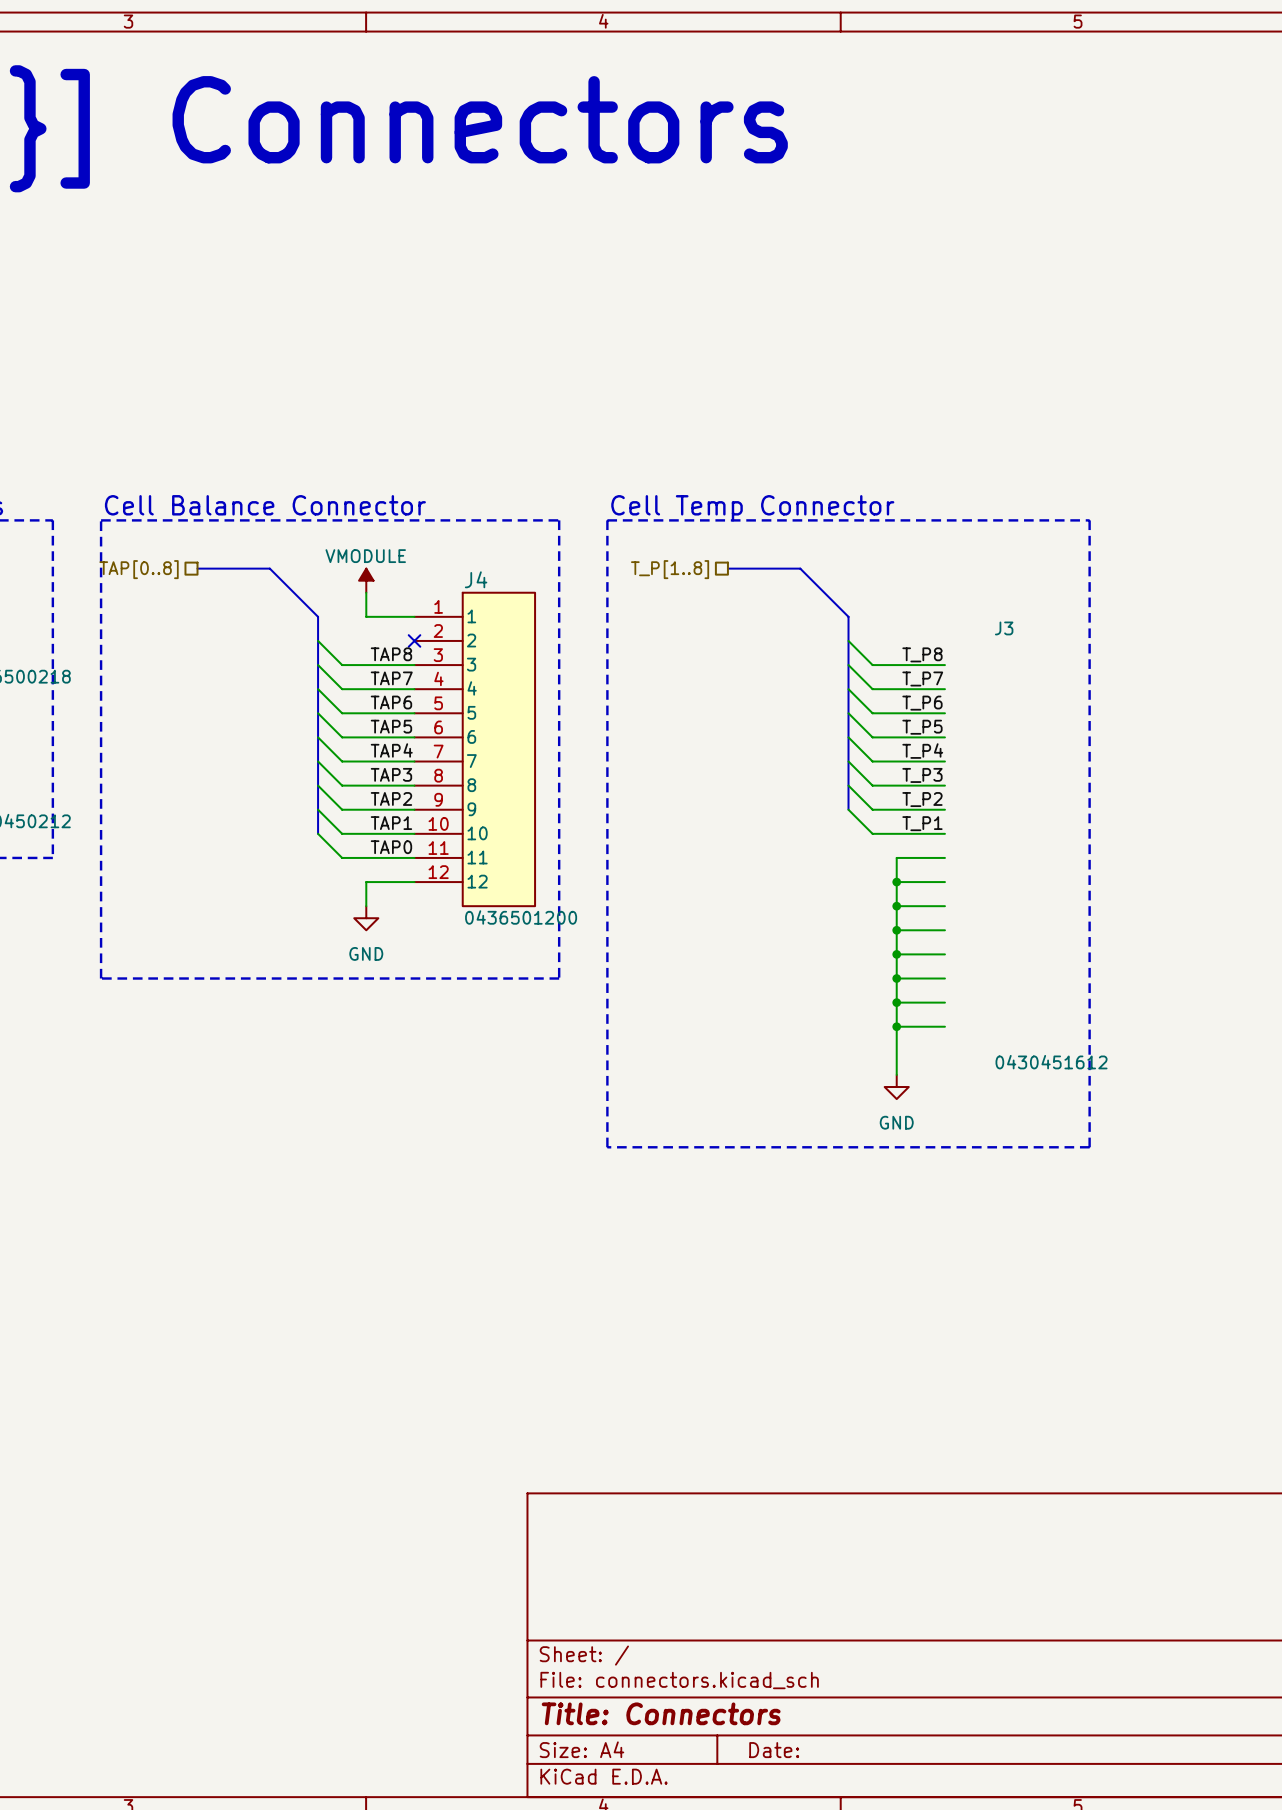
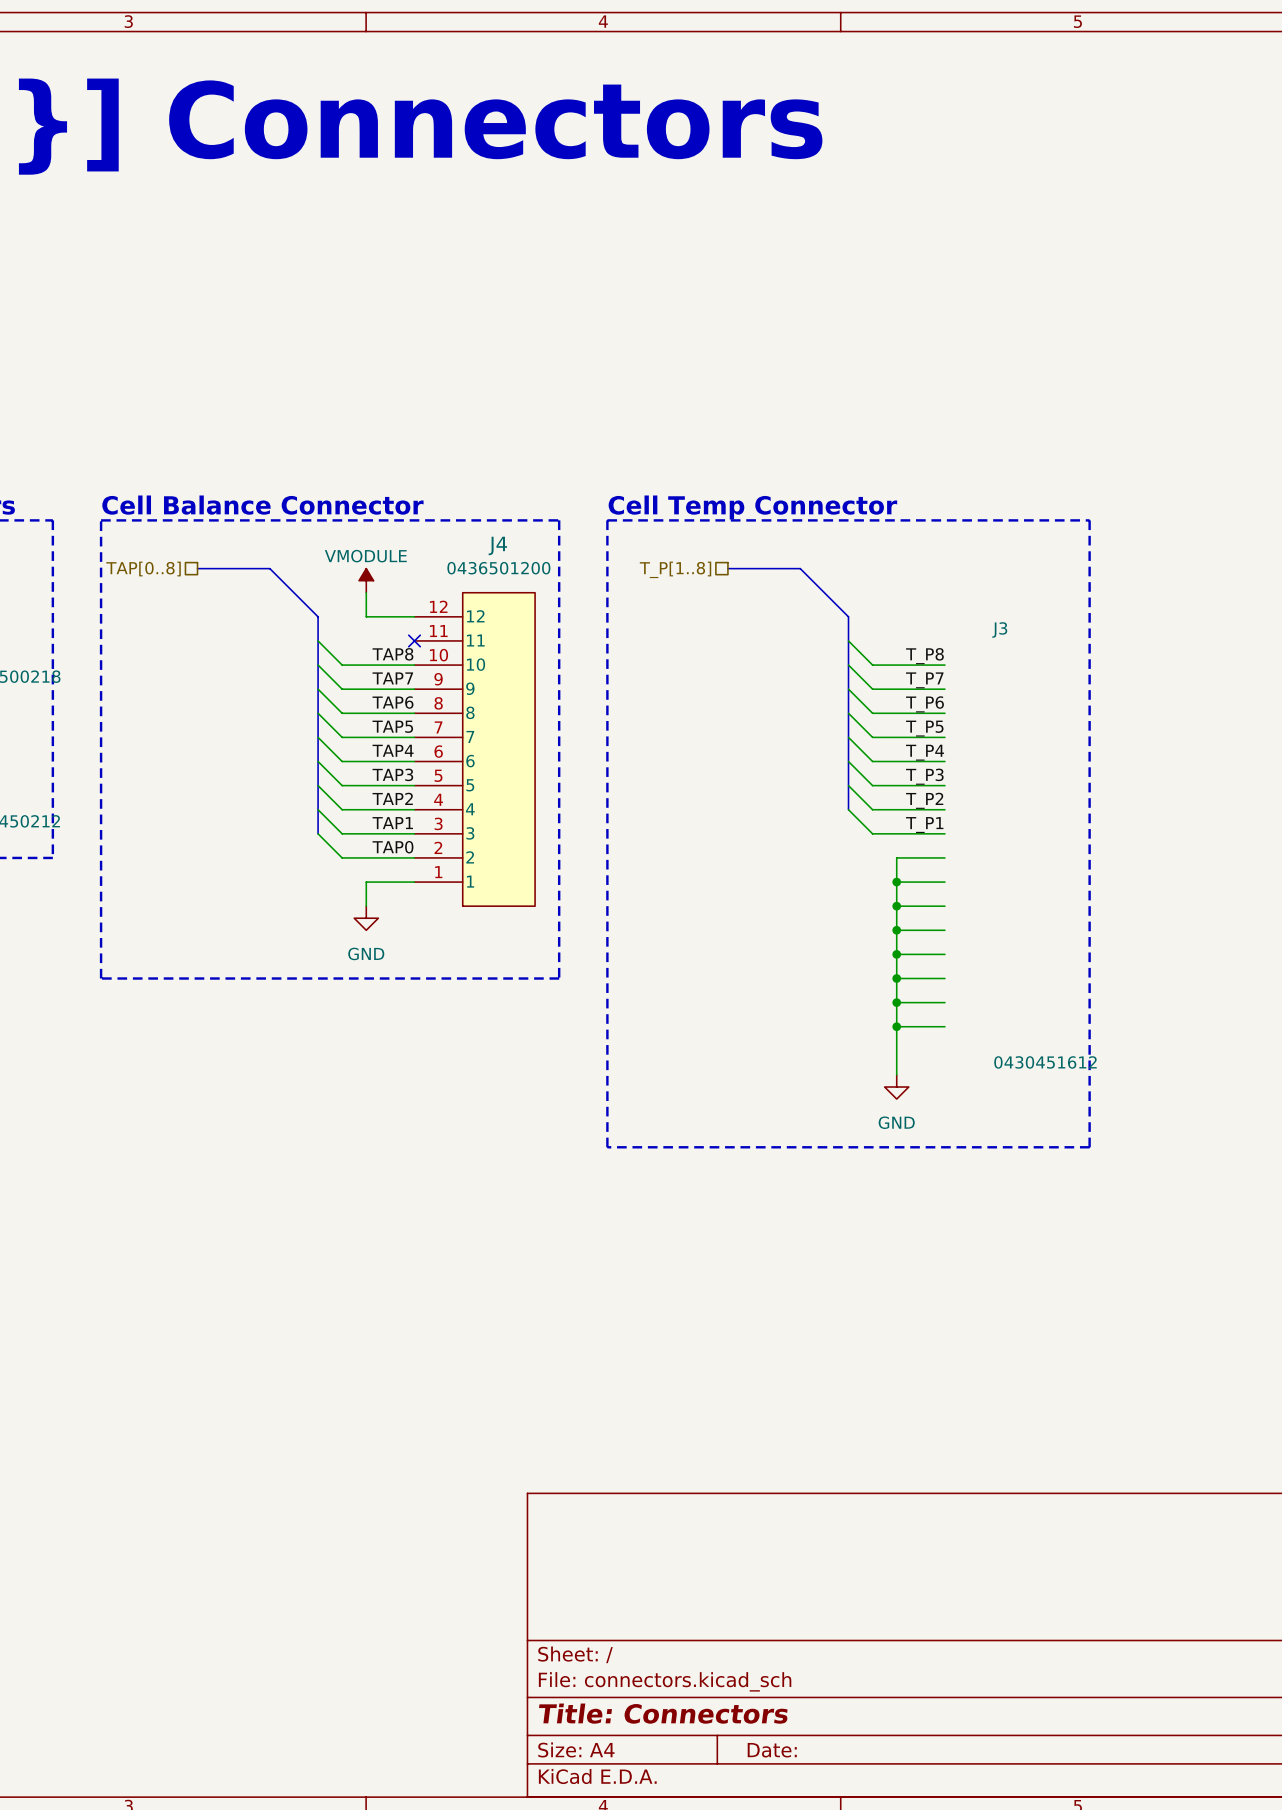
J4 name position: J4 (476, 579) -> J4 (497, 545)
J4 flip: as is (498, 749) -> up-down (498, 749)
J4 value position: 0436501200 (521, 917) -> 0436501200 (498, 568)

